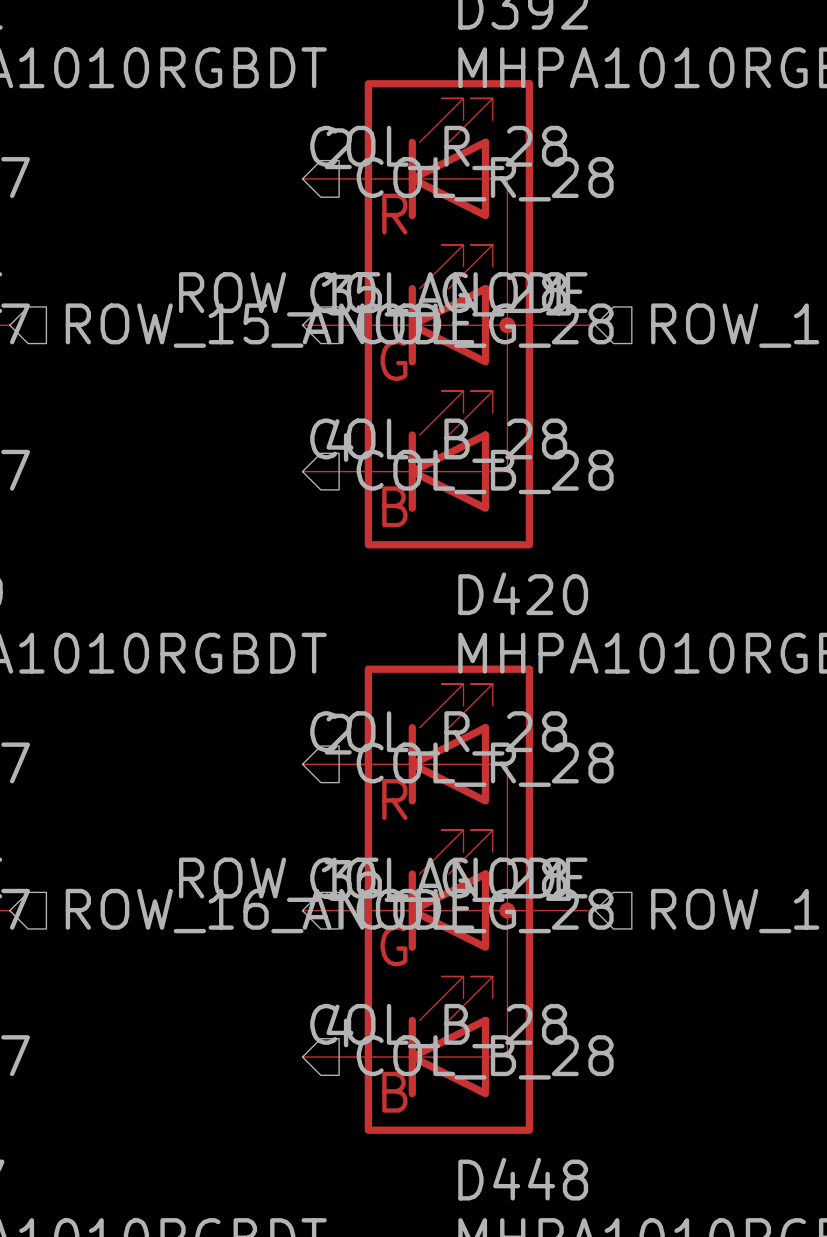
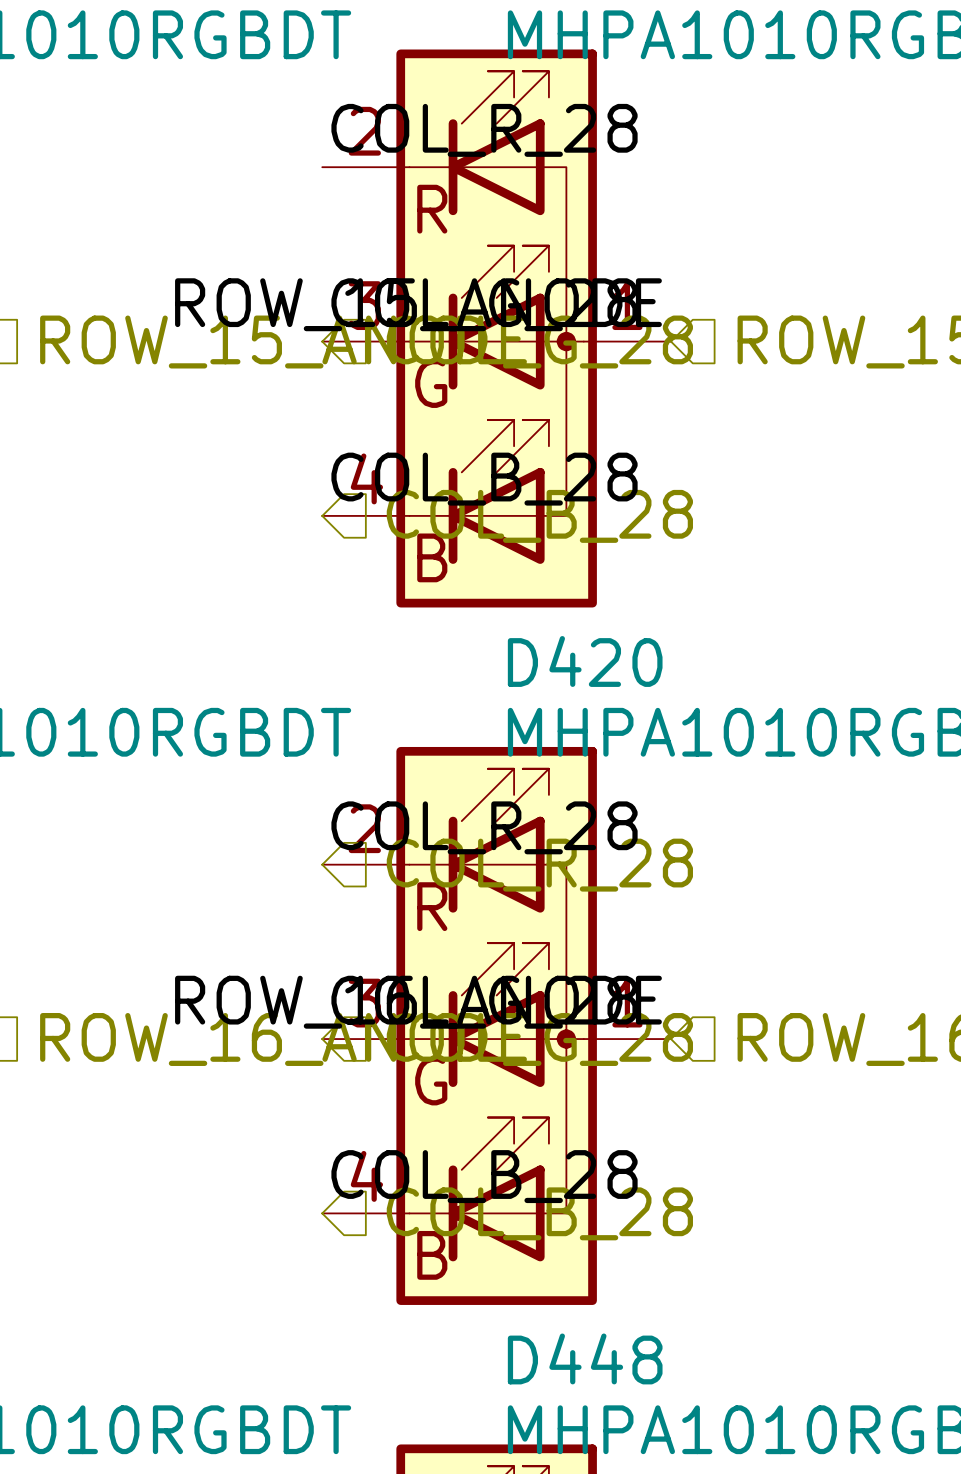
hierarchical label: COL_R_28 (485, 179) -> none

